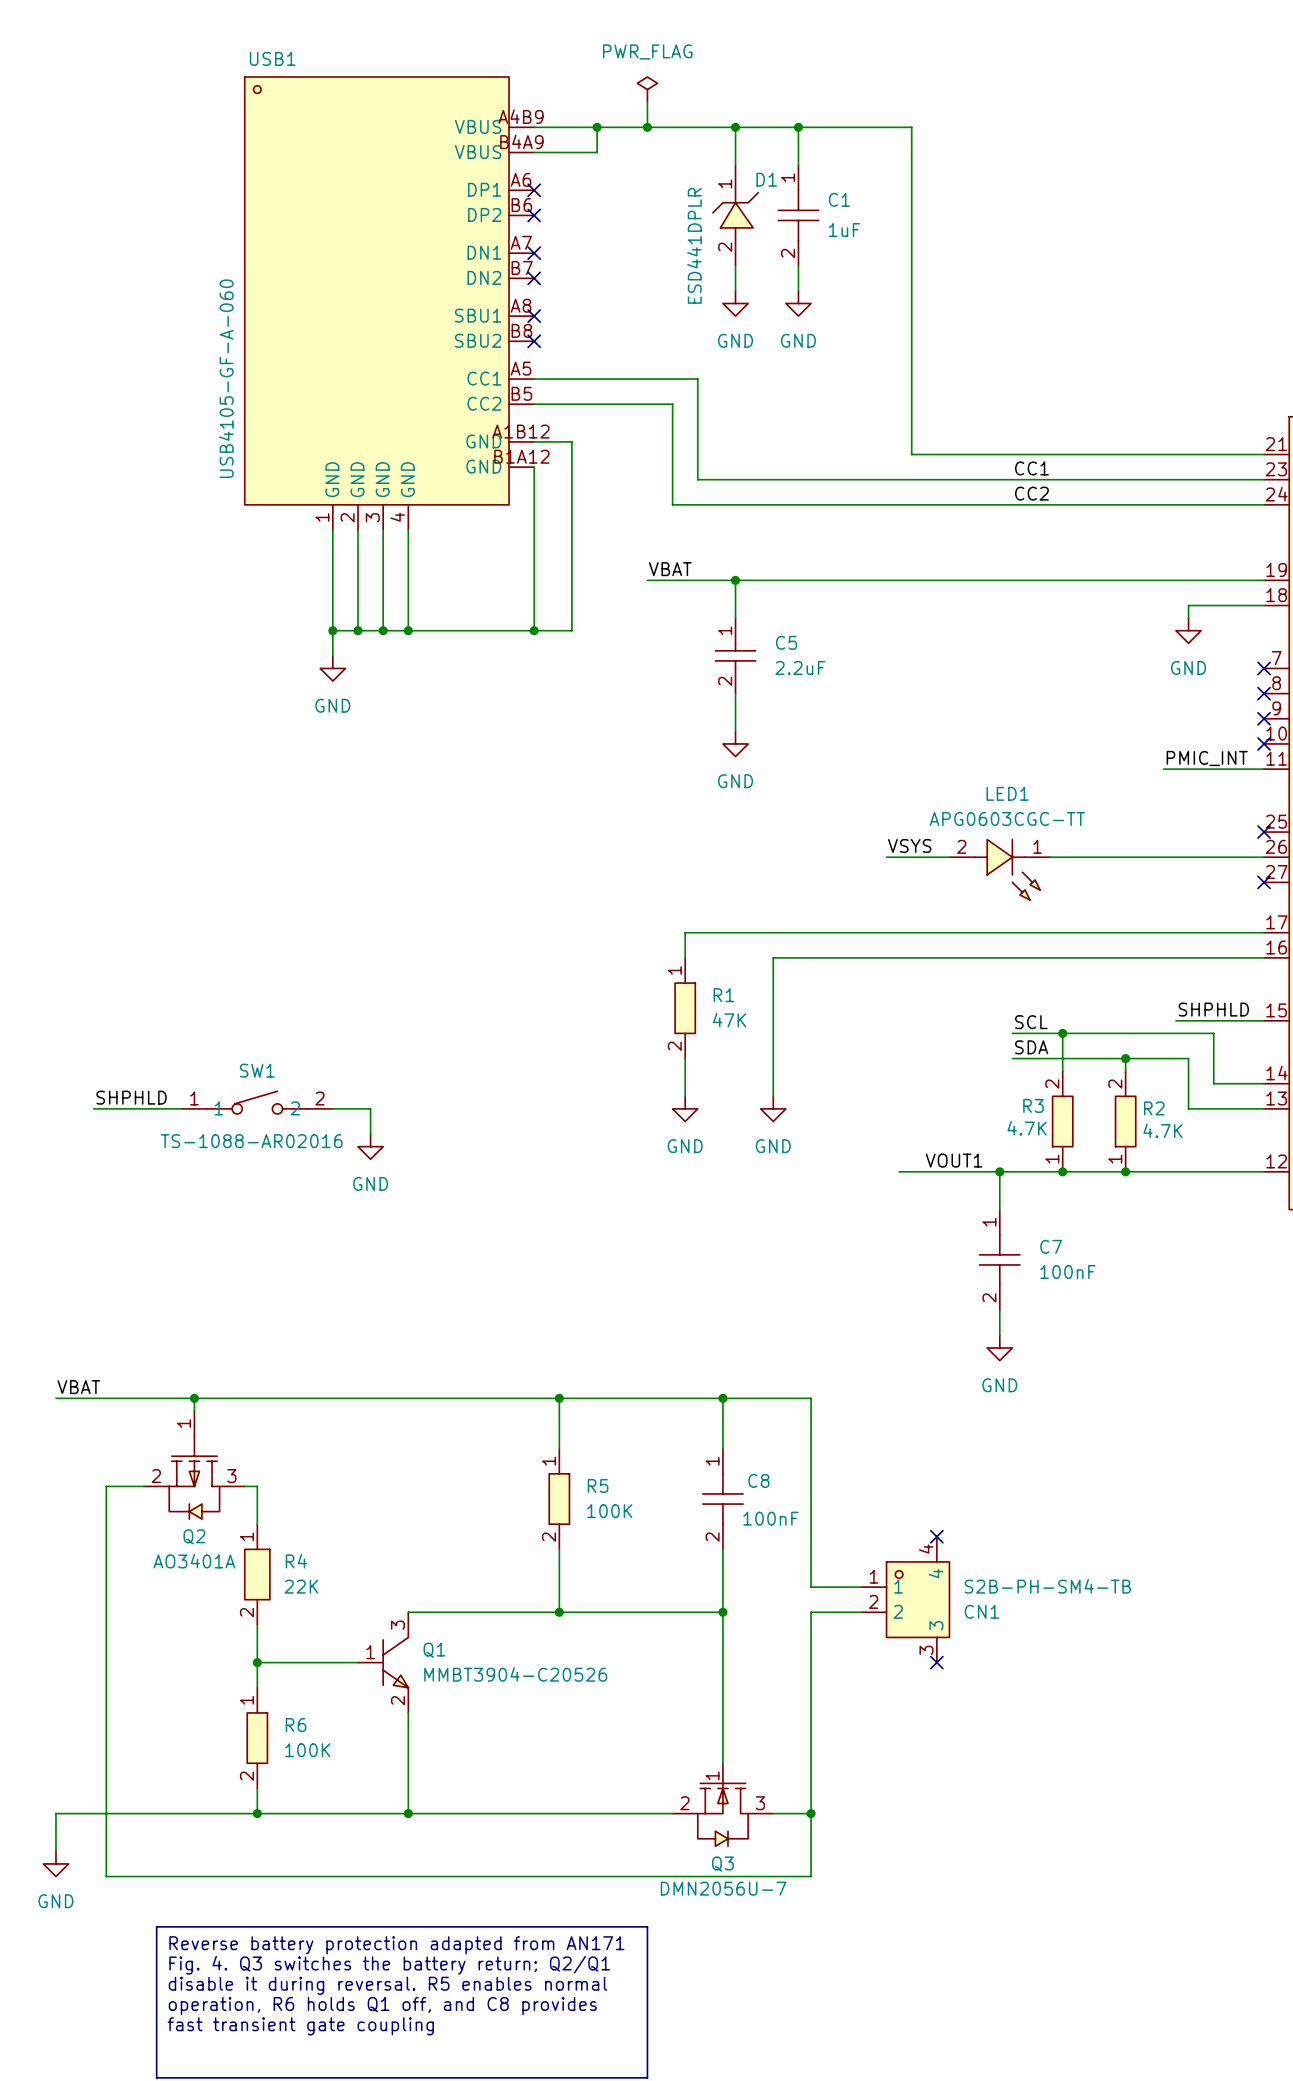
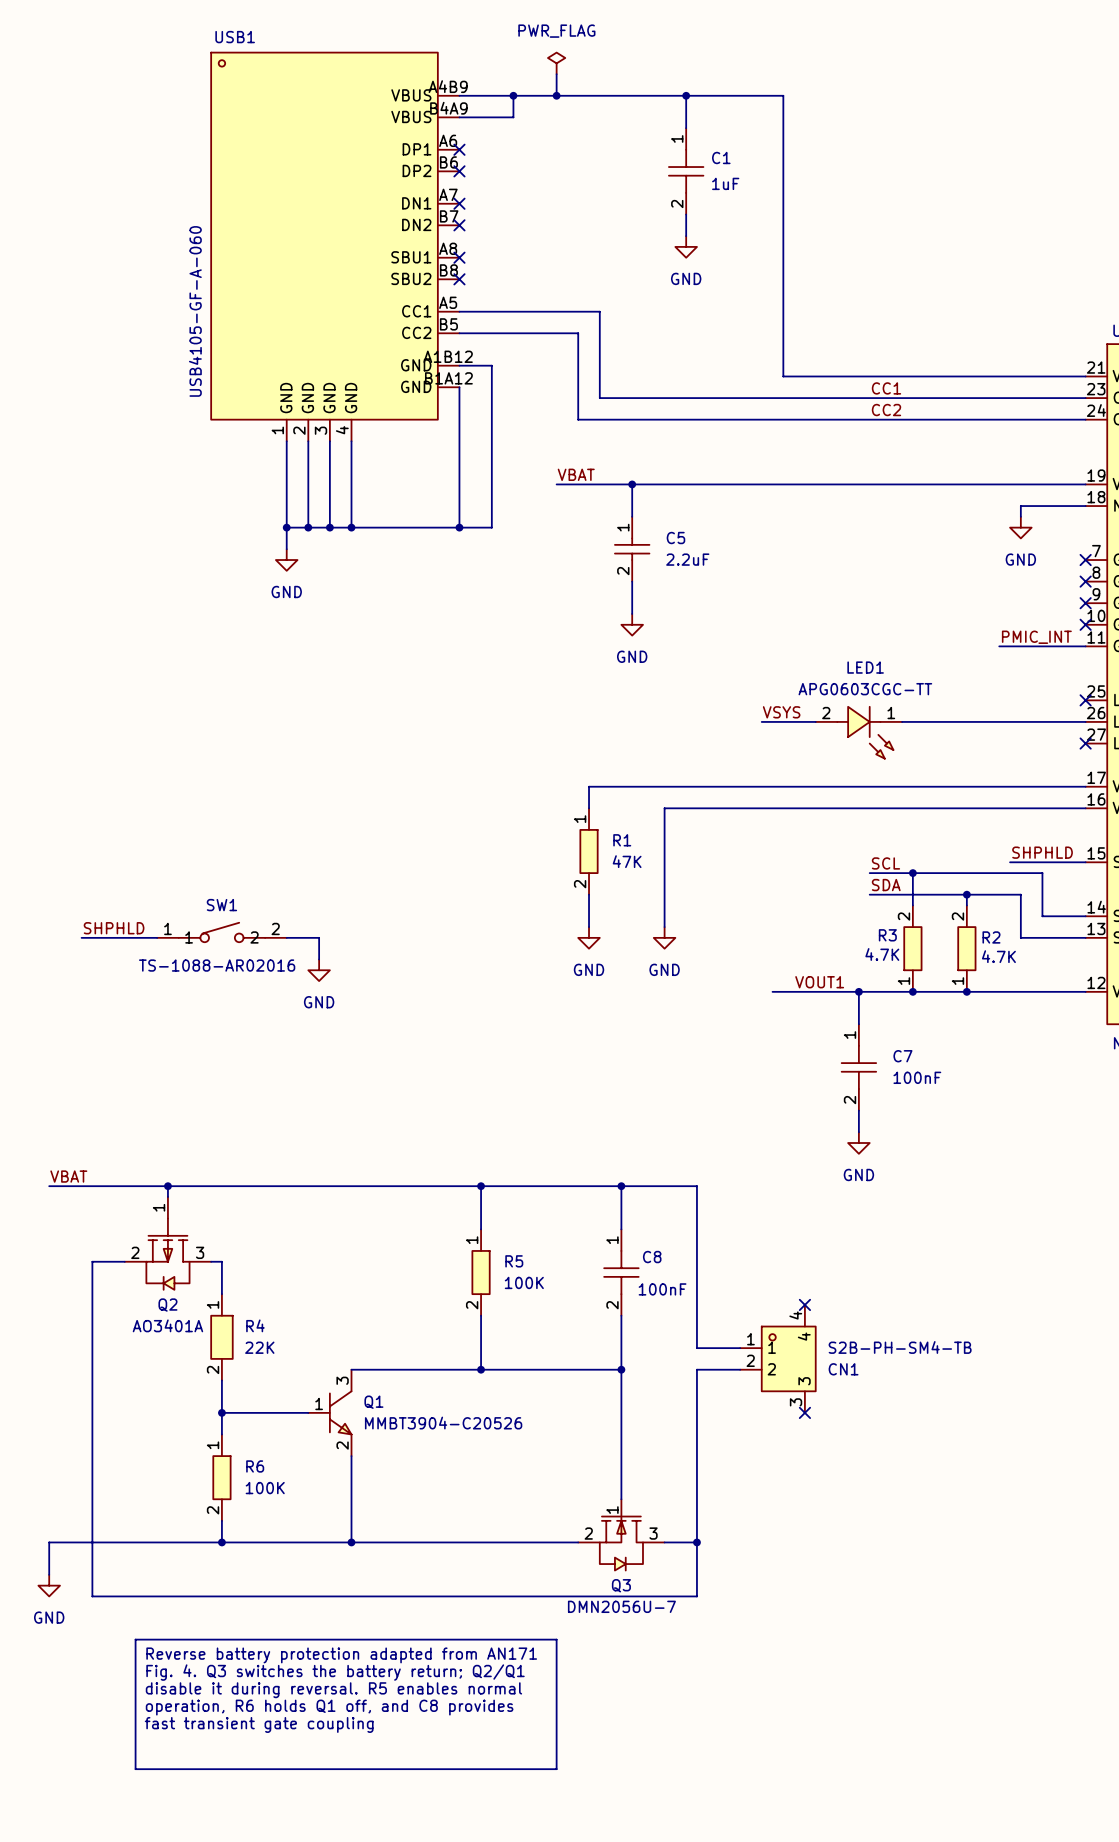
wire: (735, 127) (735, 165) -> none
junction: (735, 127) -> none
D1: ESD441DPLR (735, 215) -> none
wire: (735, 265) (735, 290) -> none
power symbol: GND (735, 303) -> none

